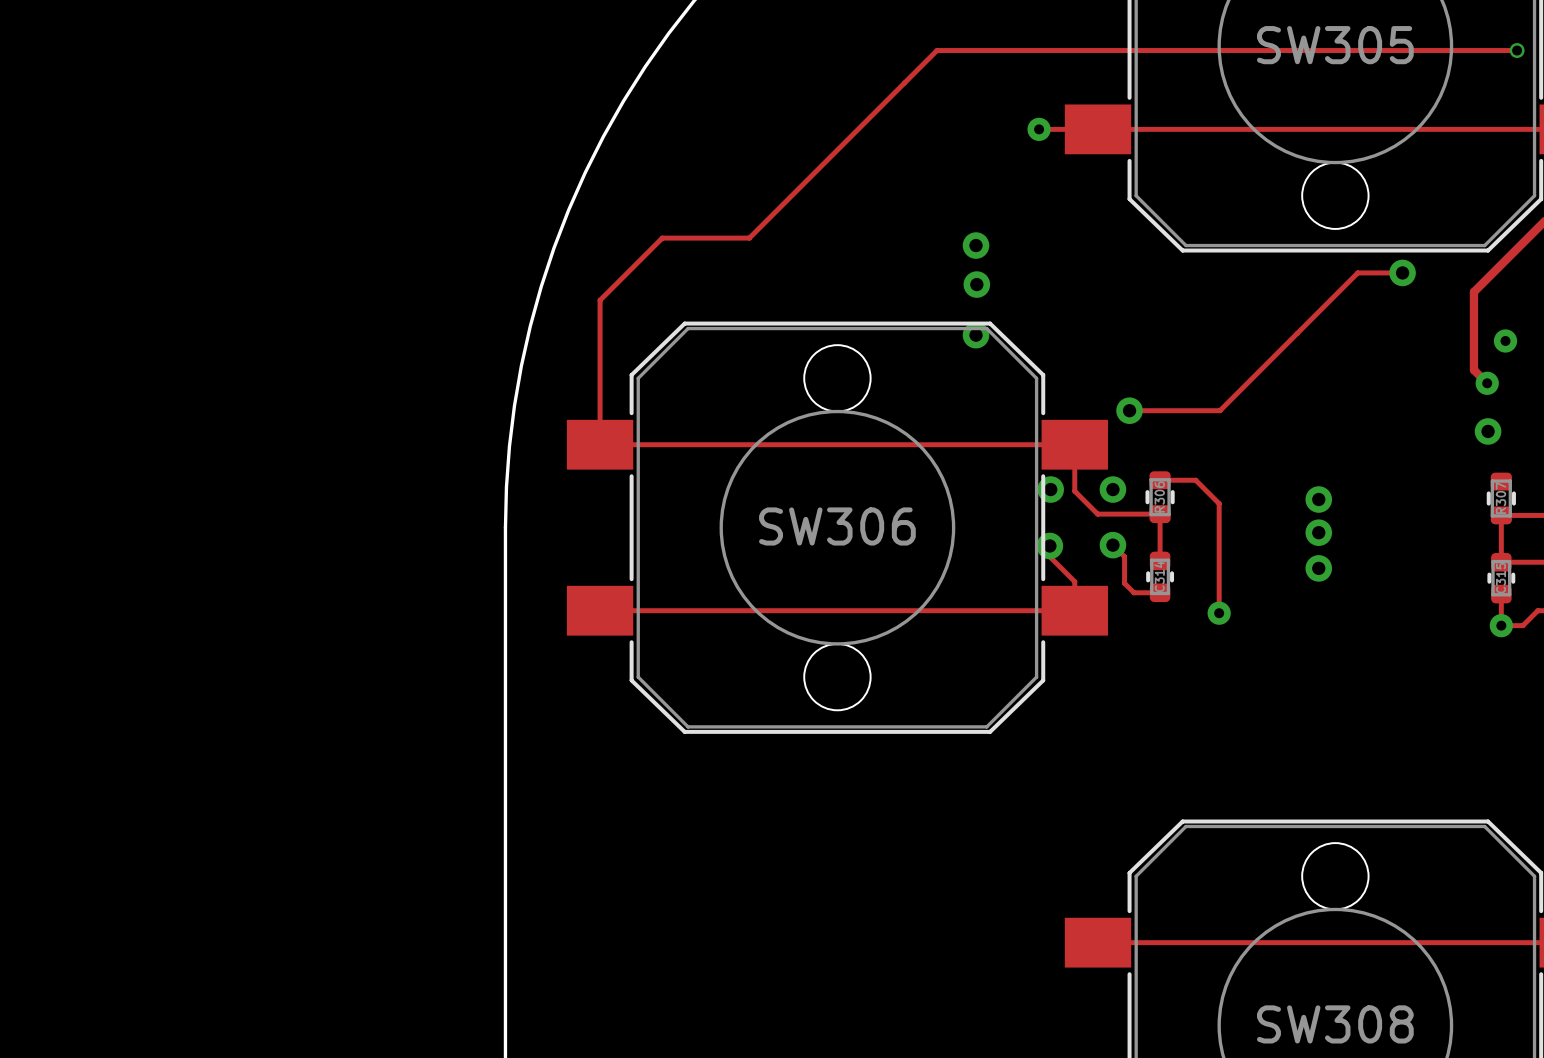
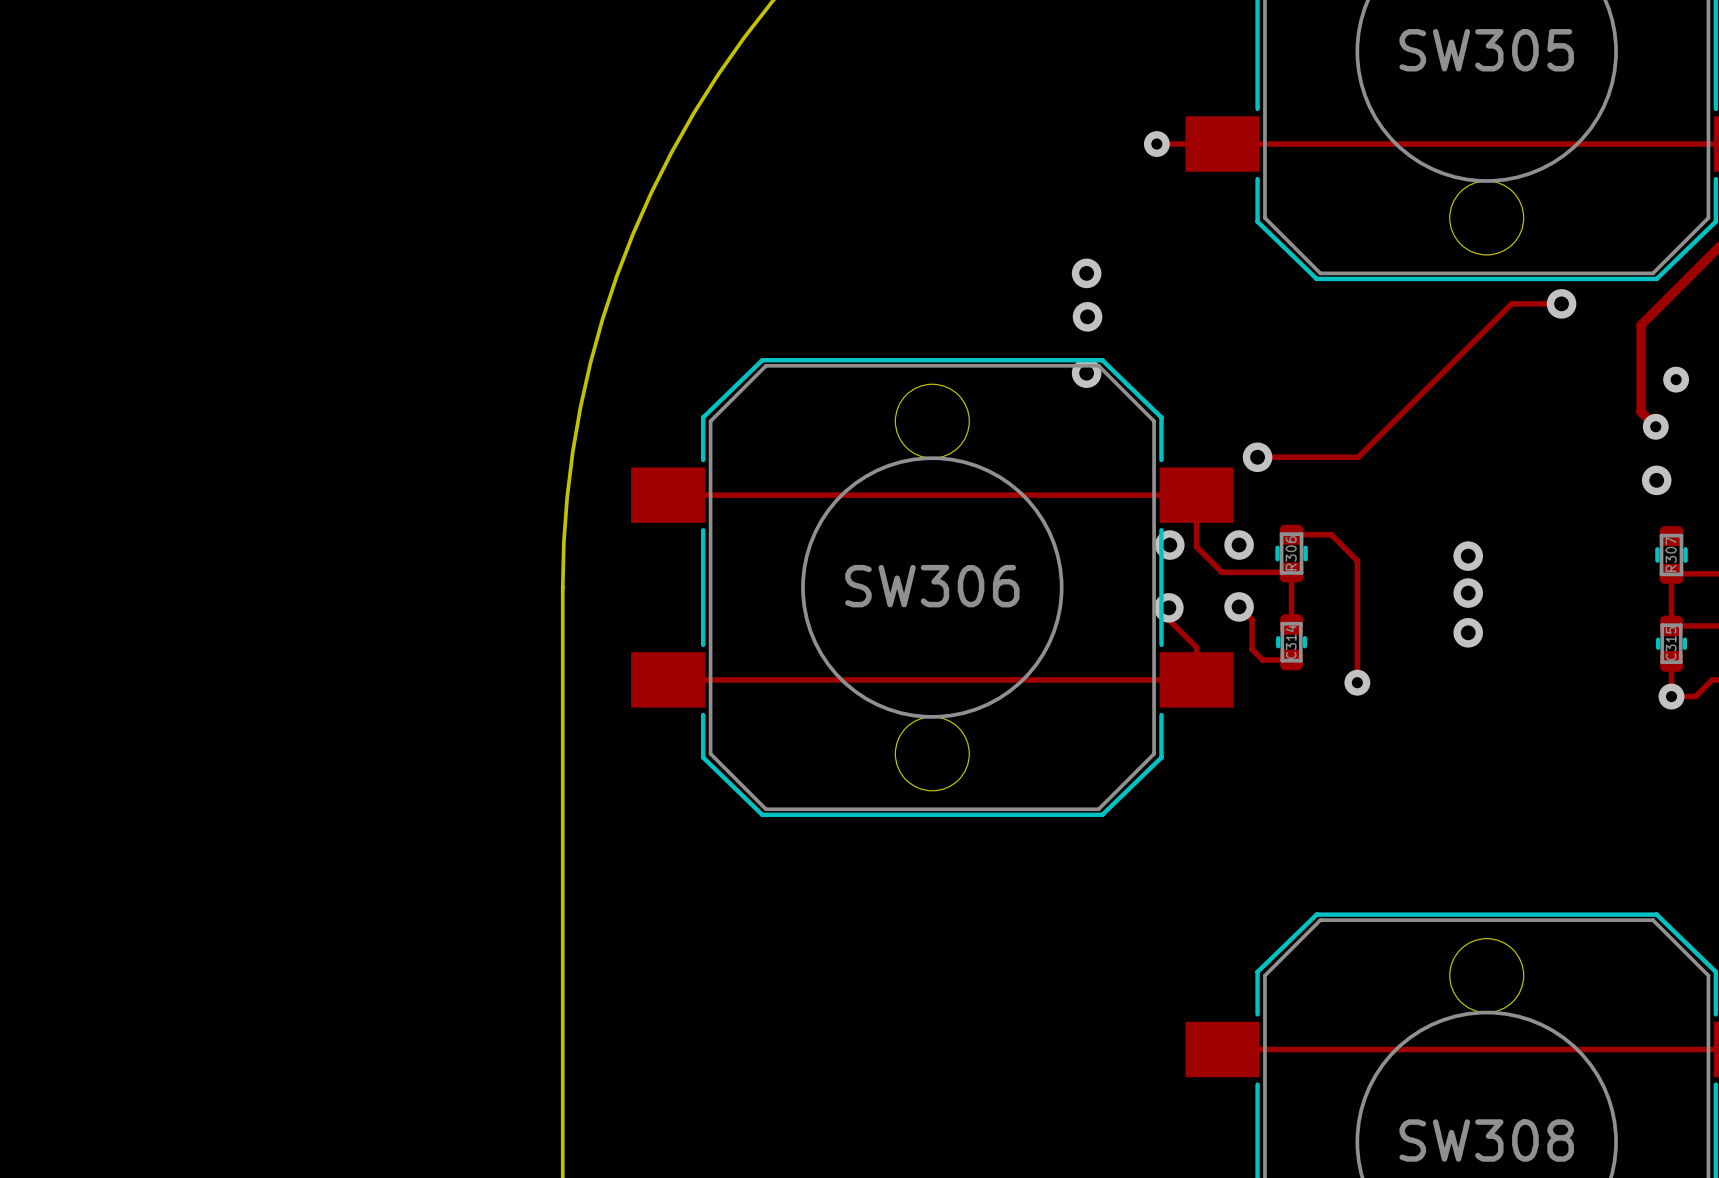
track: (1517, 50) (937, 50) (749, 238) (662, 238) (600, 300) (600, 444) -> none
via: (1517, 50) -> none

